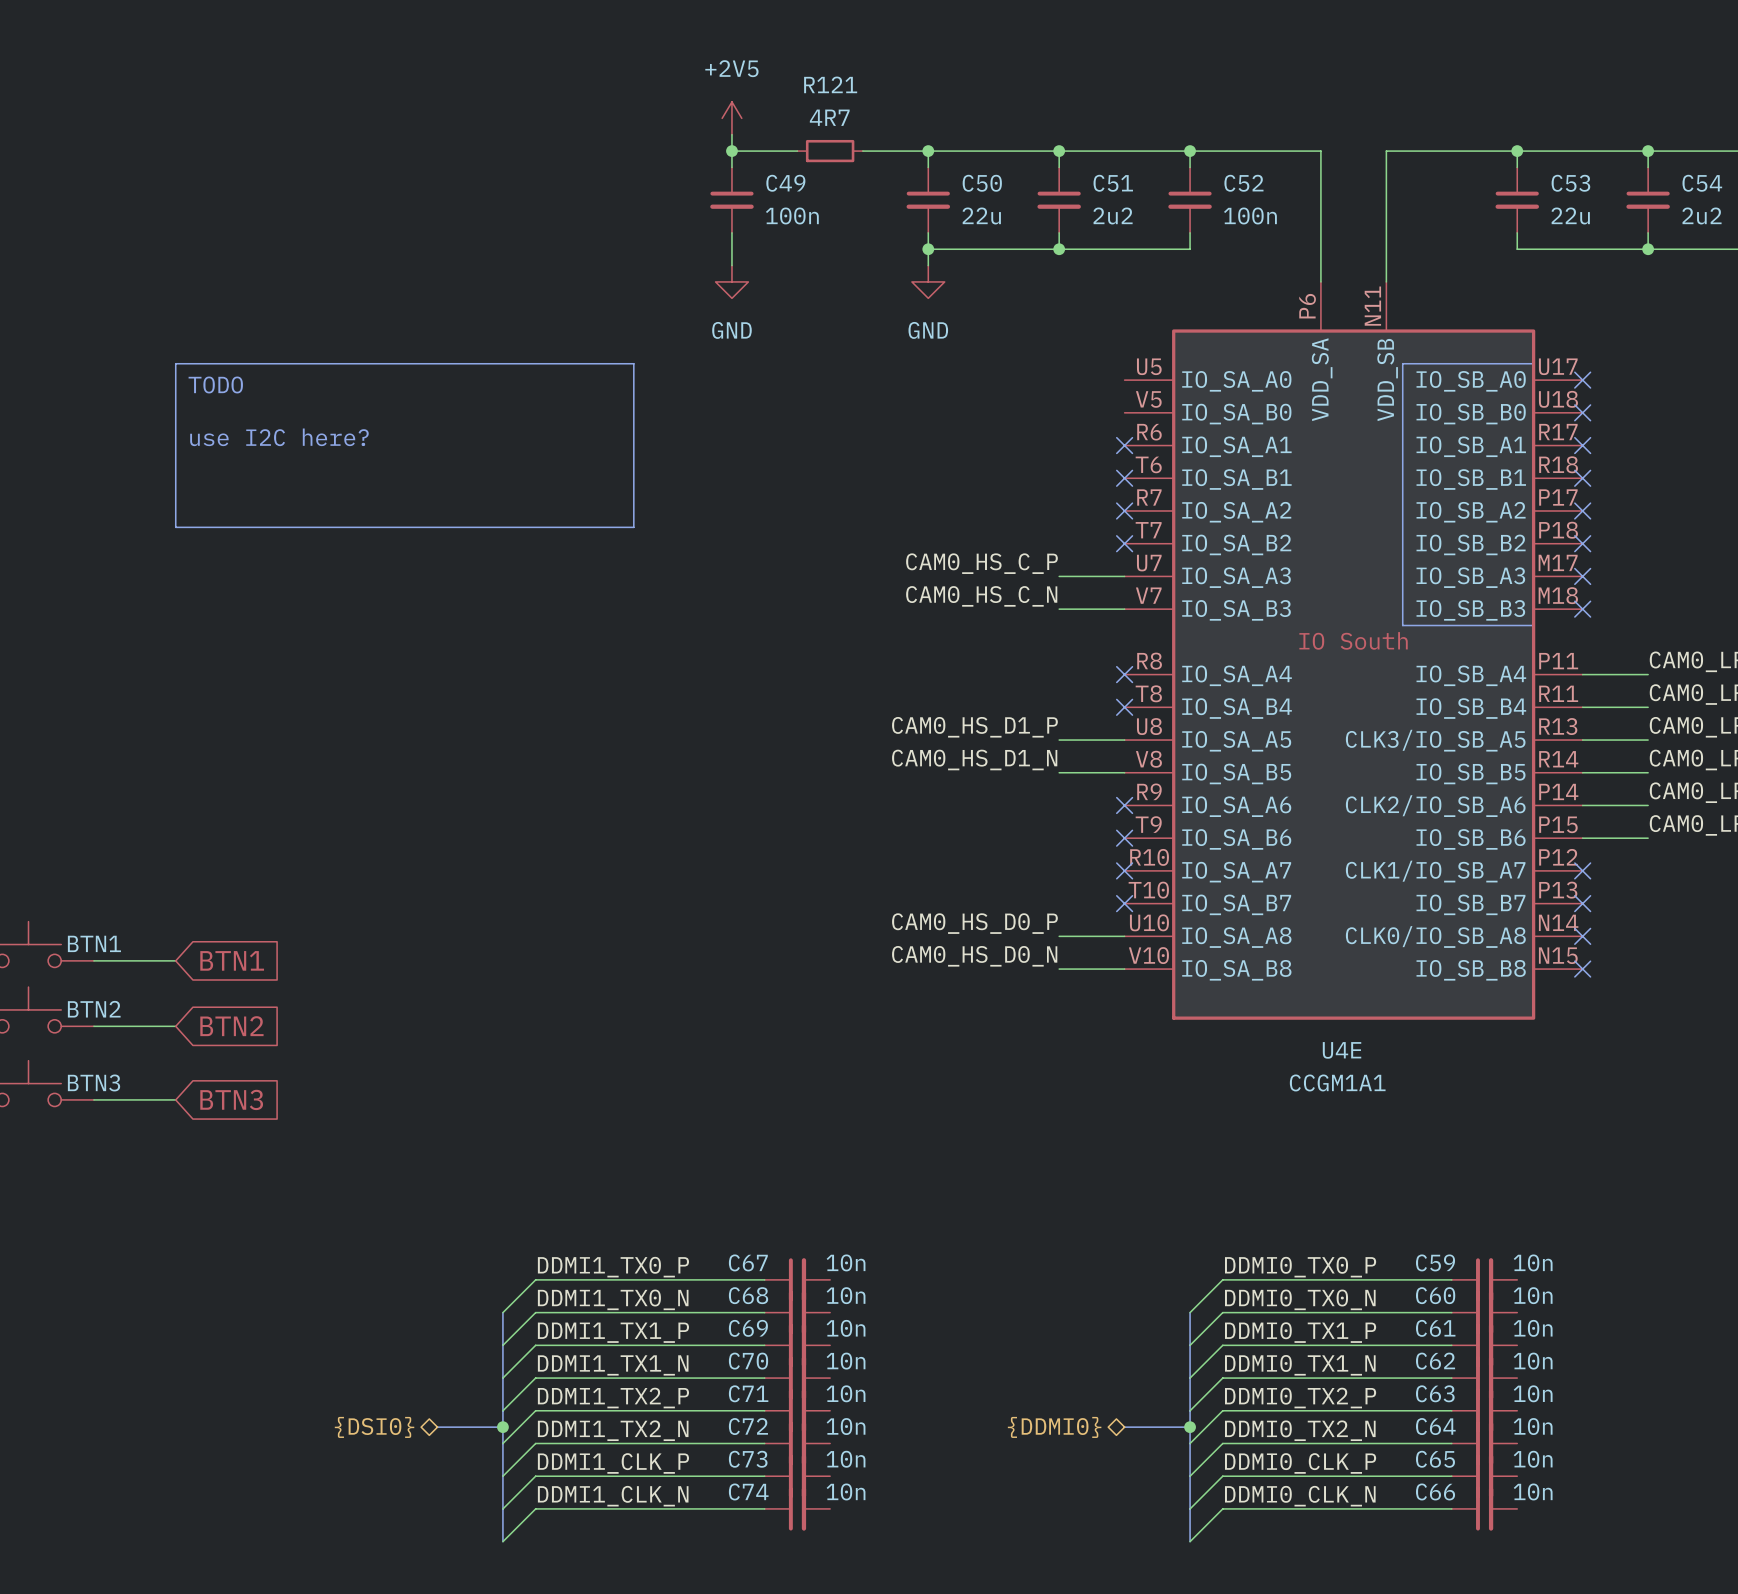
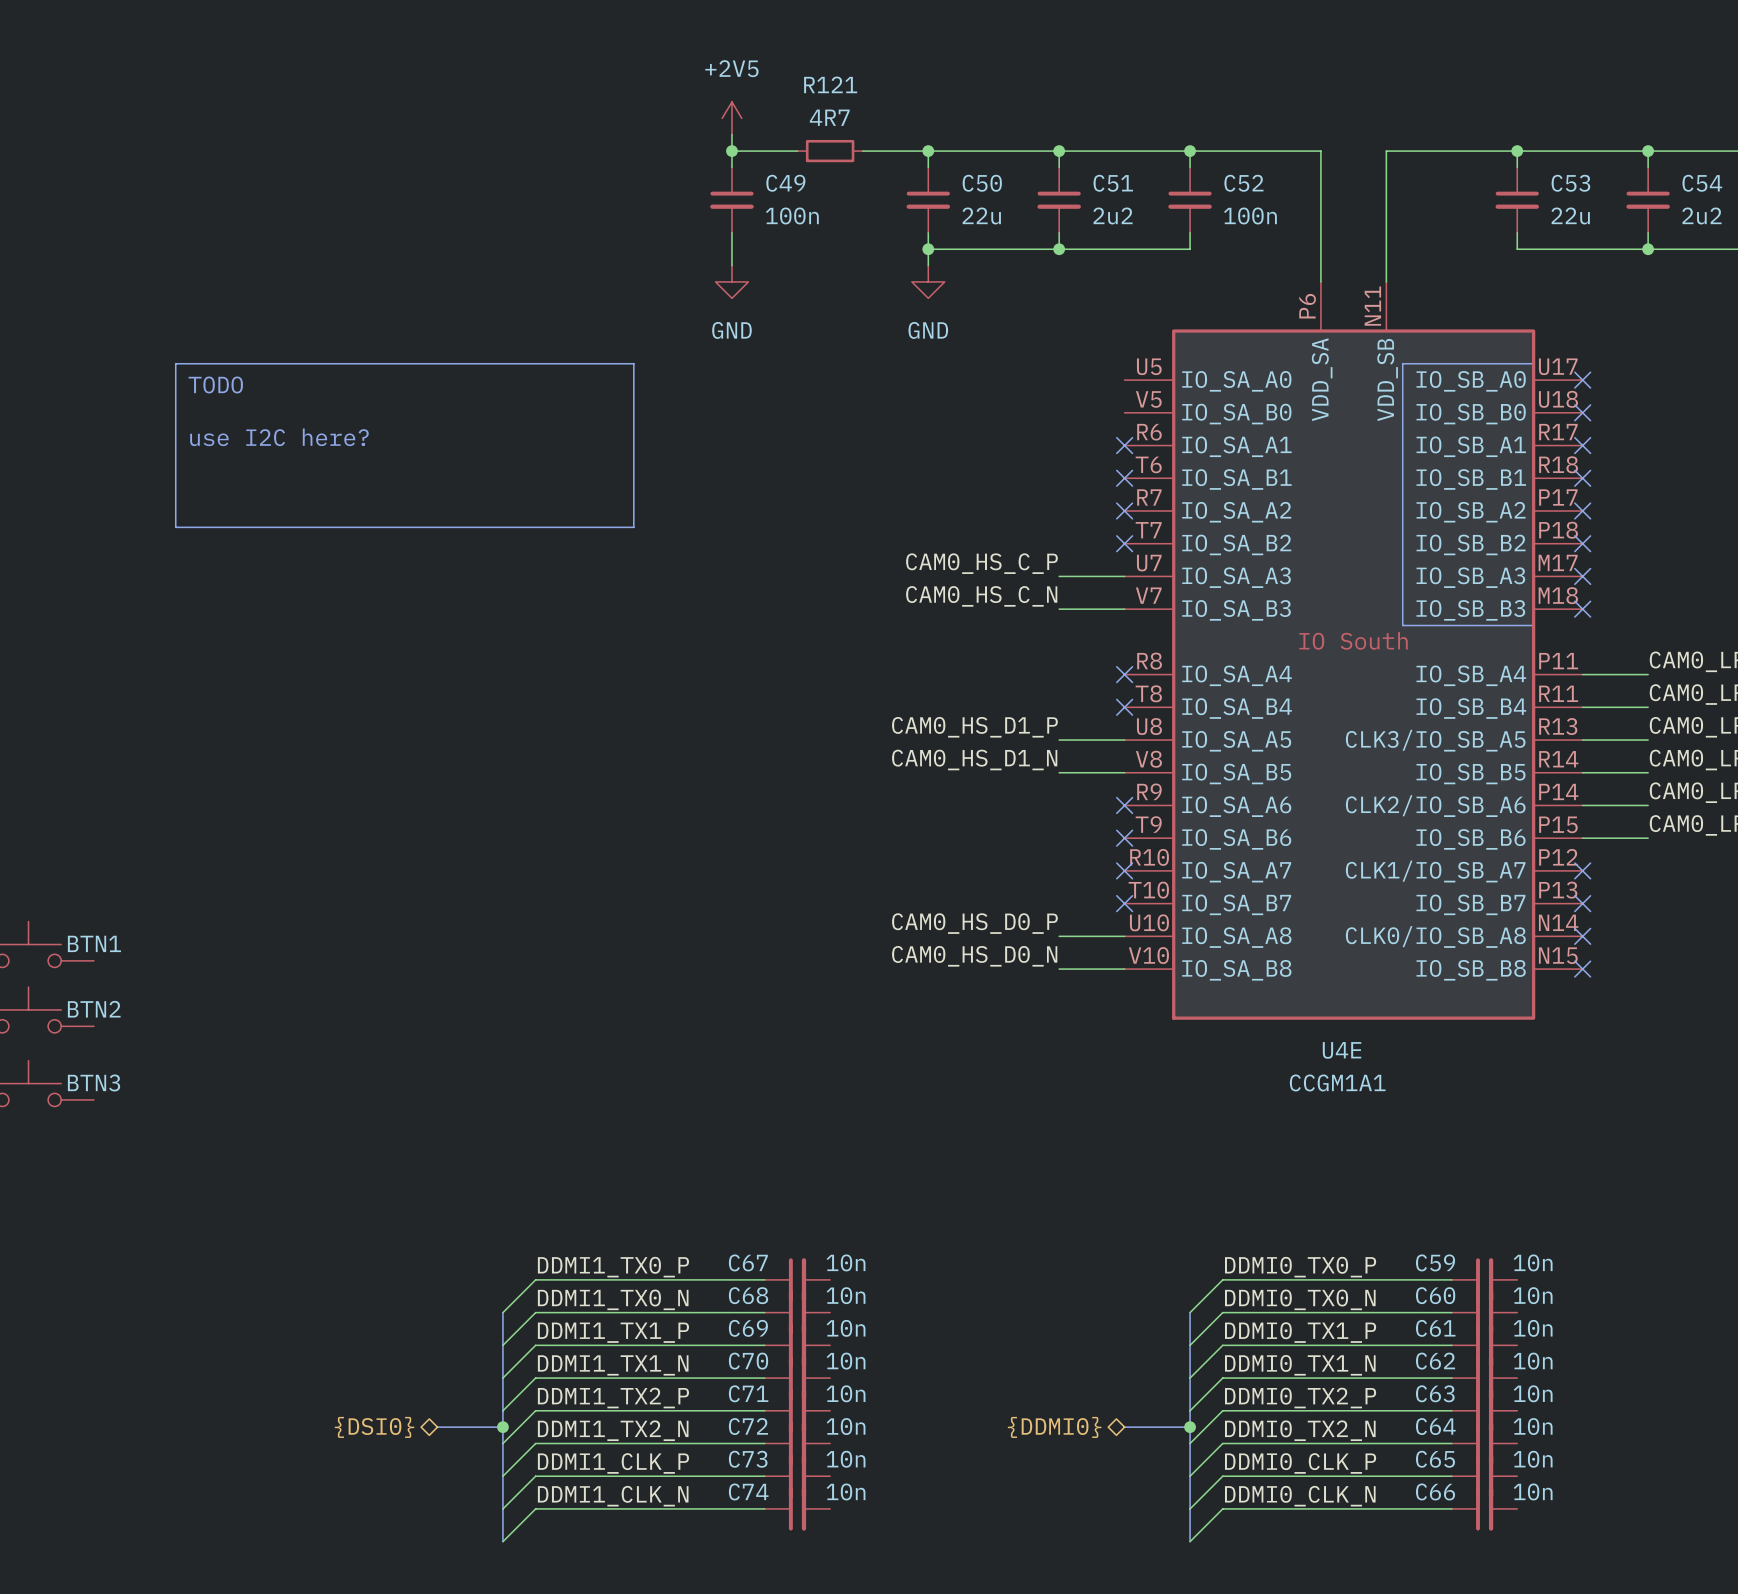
wire: (93, 960) (175, 960) -> none
global label: BTN1 (232, 960) -> none
wire: (93, 1026) (175, 1026) -> none
global label: BTN2 (231, 1026) -> none
wire: (93, 1099) (175, 1099) -> none
global label: BTN3 (231, 1099) -> none

